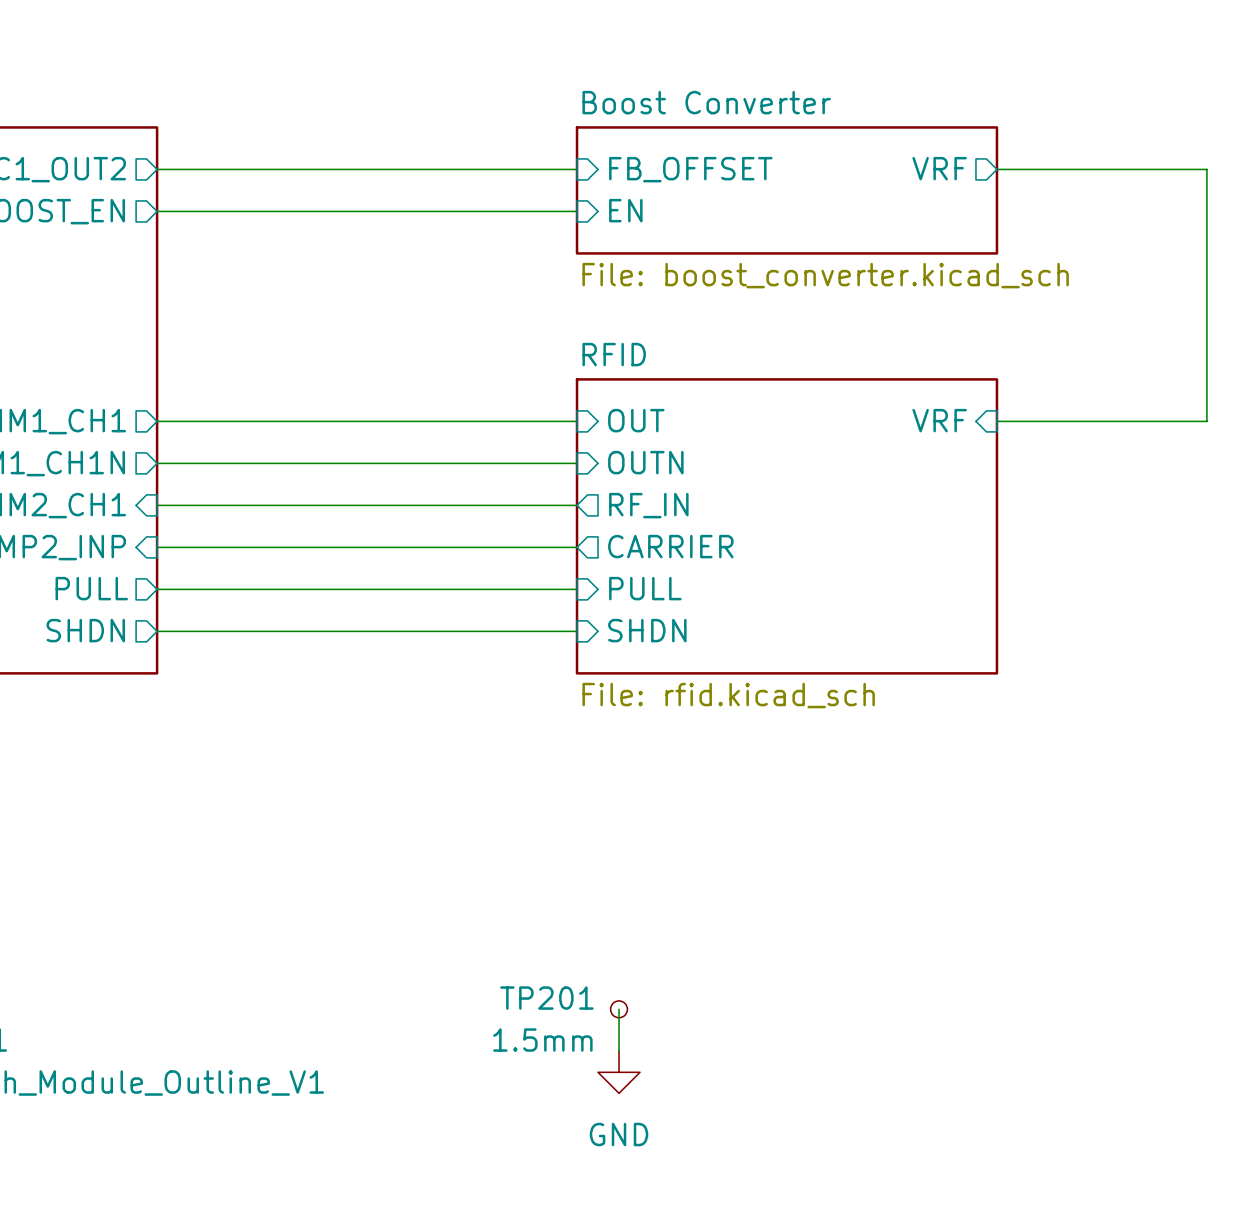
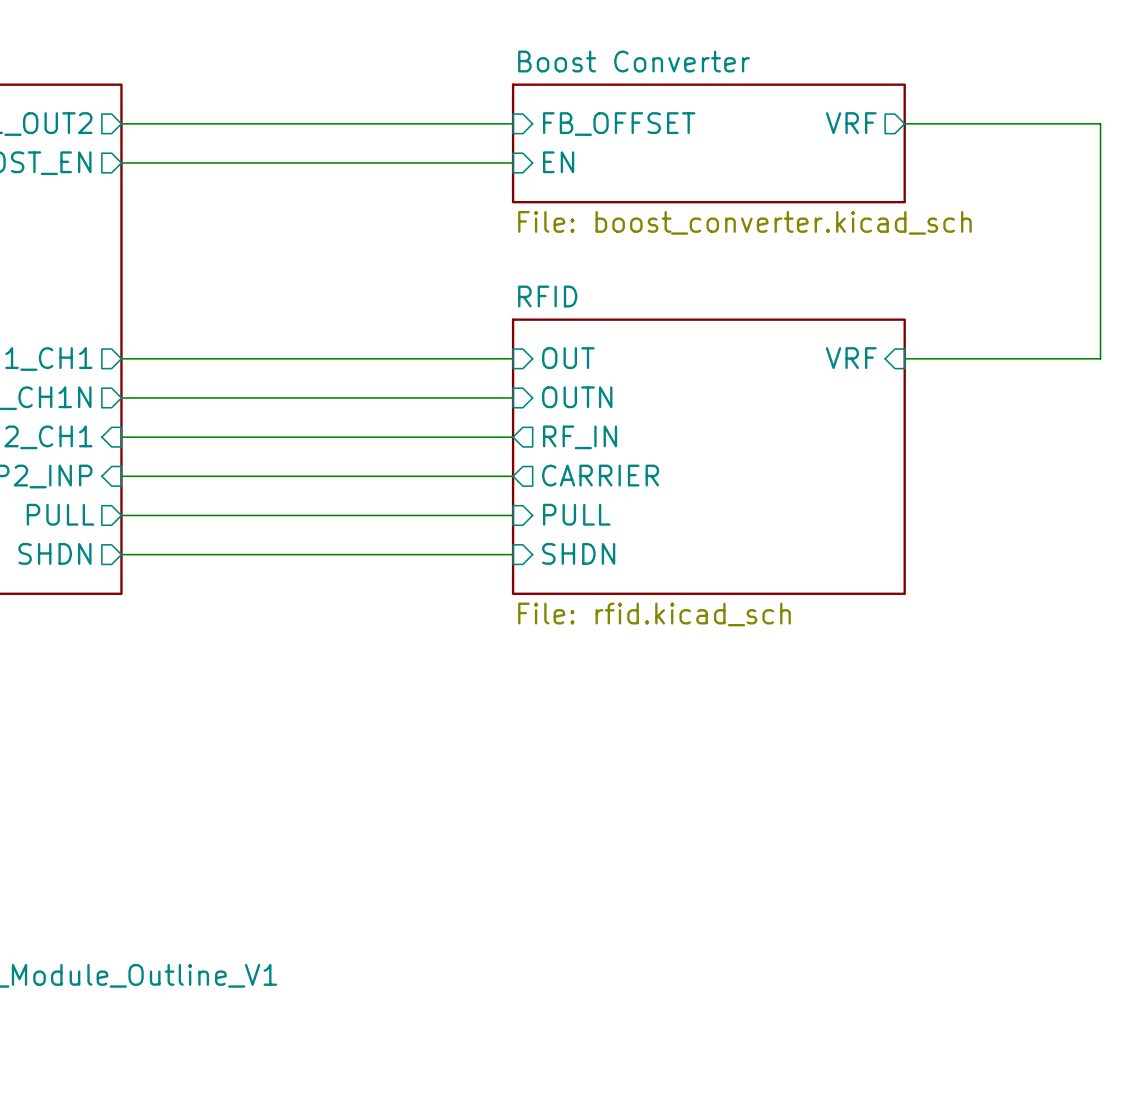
wire: (619, 1009) (619, 1051) -> none
TP201: 1.5mm (619, 1009) -> none
power symbol: GND (619, 1072) -> none

